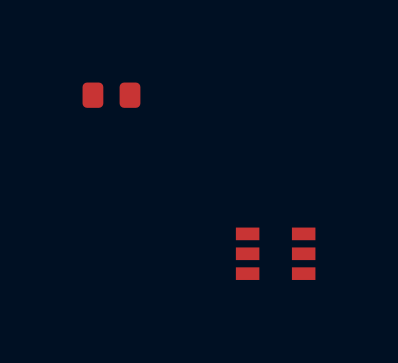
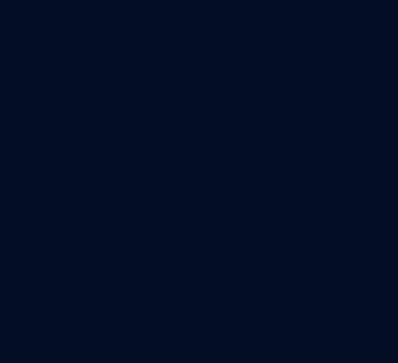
part: (111, 95) -> none
part: (275, 253) -> none

